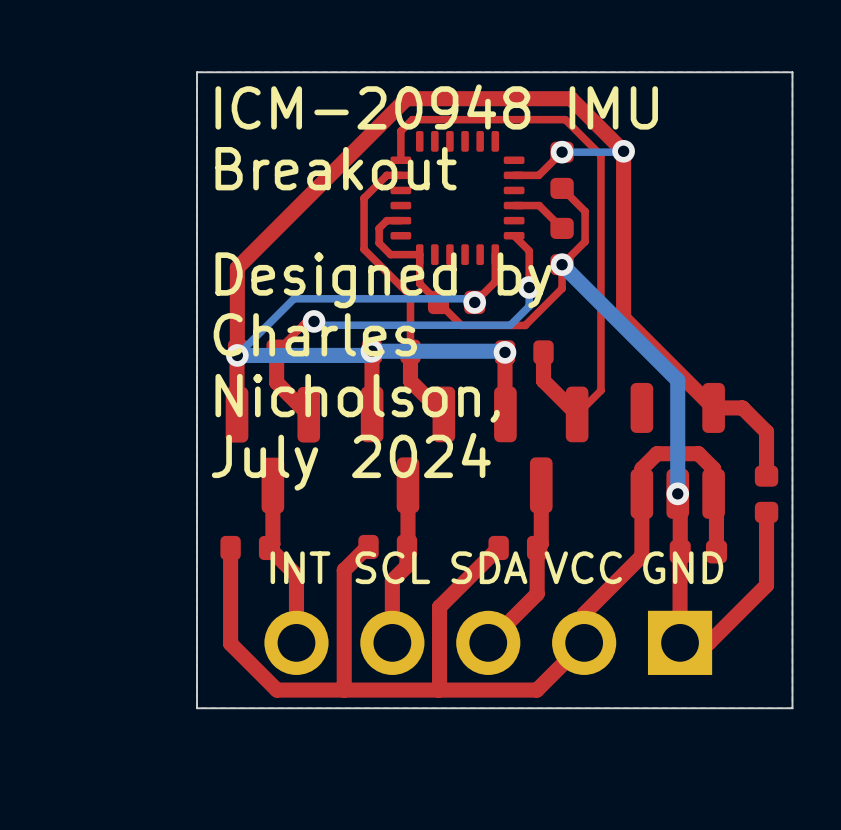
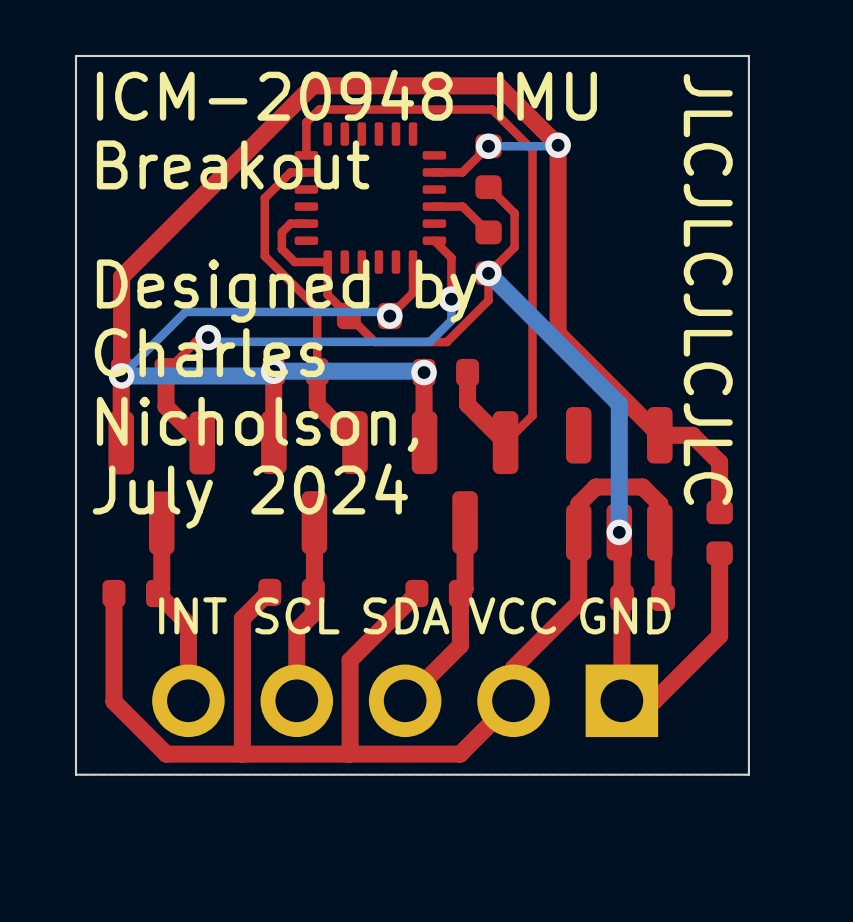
text: none -> JLCJLCJLCJLC (708, 289)

